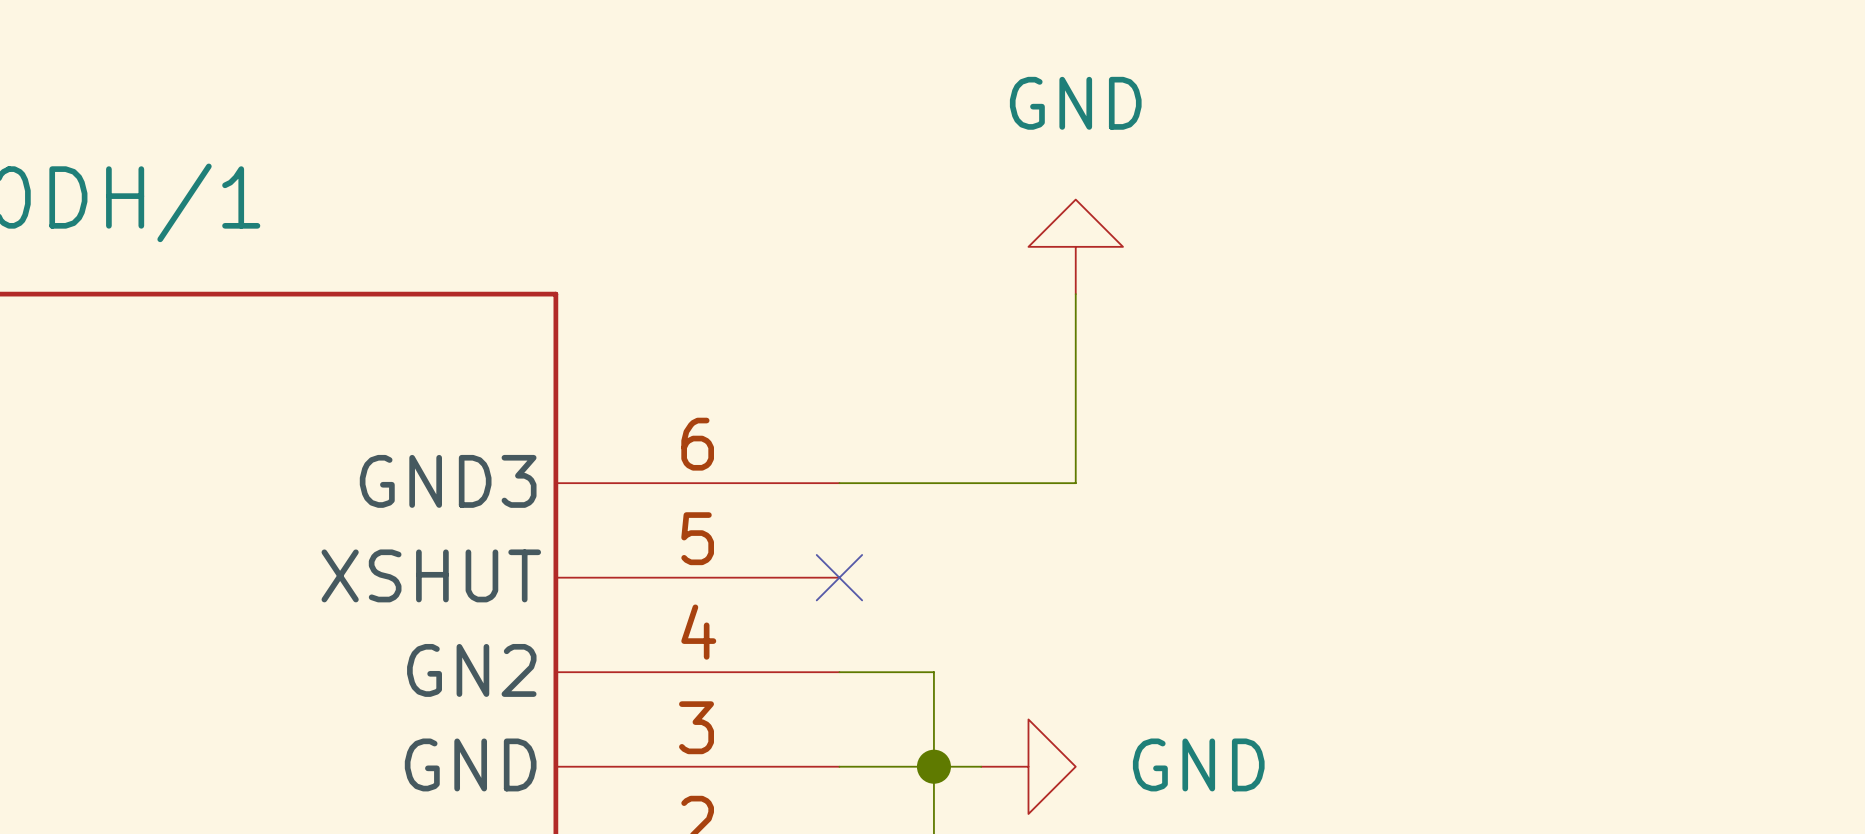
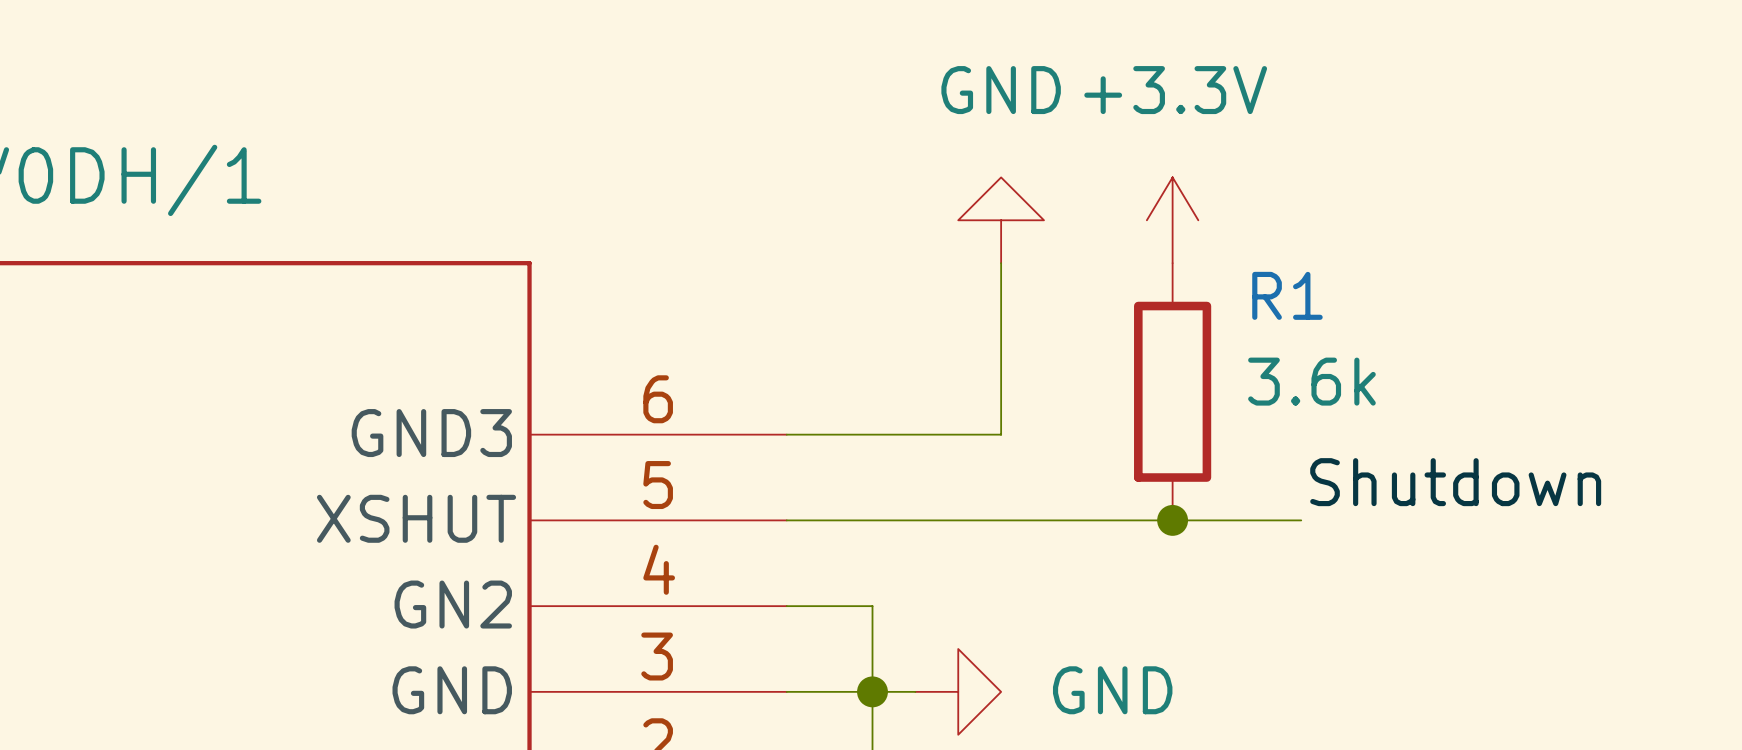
power symbol: none -> +3.3V (1172, 220)
R1: none -> 3.6k (1172, 391)
label: none -> Shutdown (1455, 482)
wire: none -> (786, 520) (1301, 520)
no-connect mark: (839, 577) -> none
junction: none -> (1172, 520)

